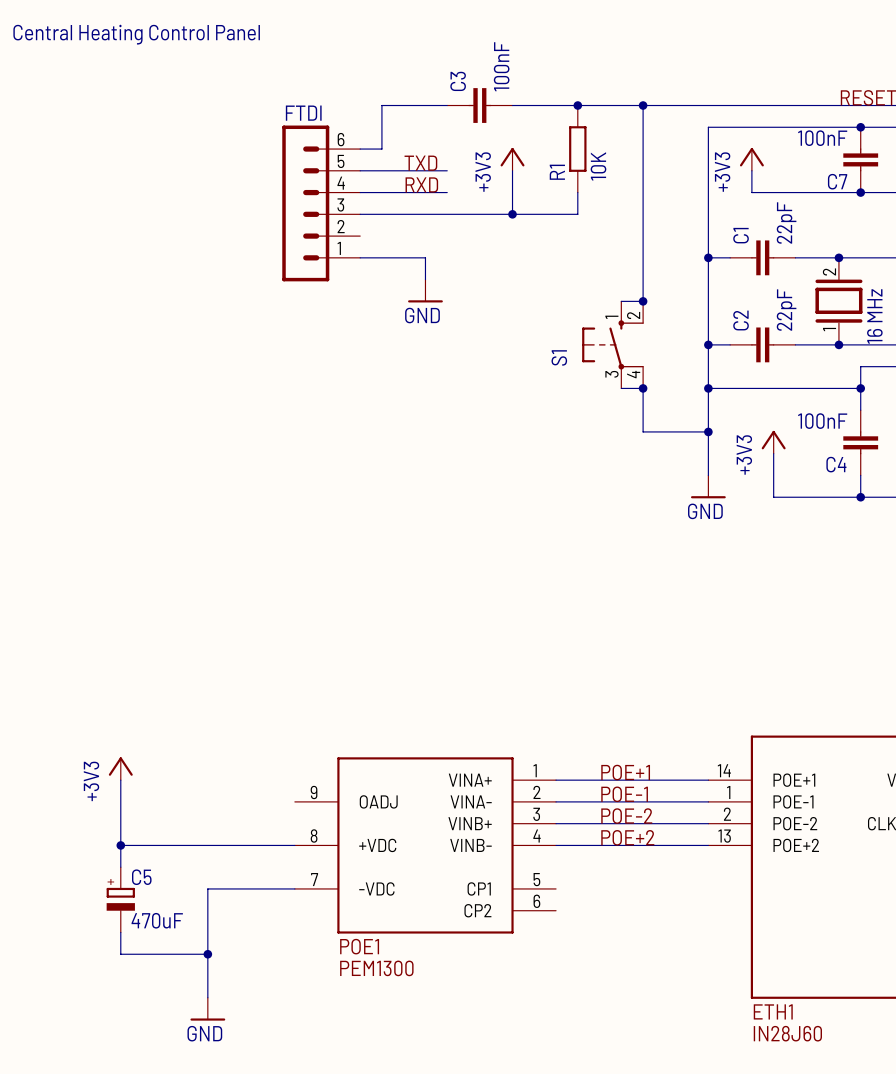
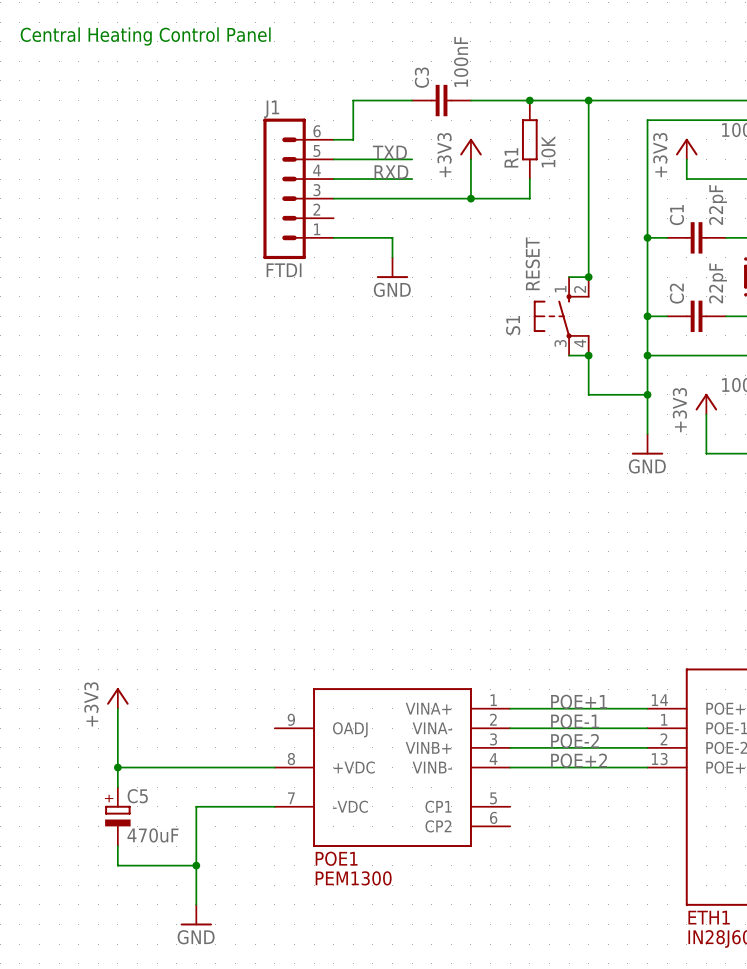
FTDI name: FTDI (303, 113) -> J1 (271, 109)
S1 value: none -> RESET (532, 263)
FTDI value: none -> FTDI (284, 270)

